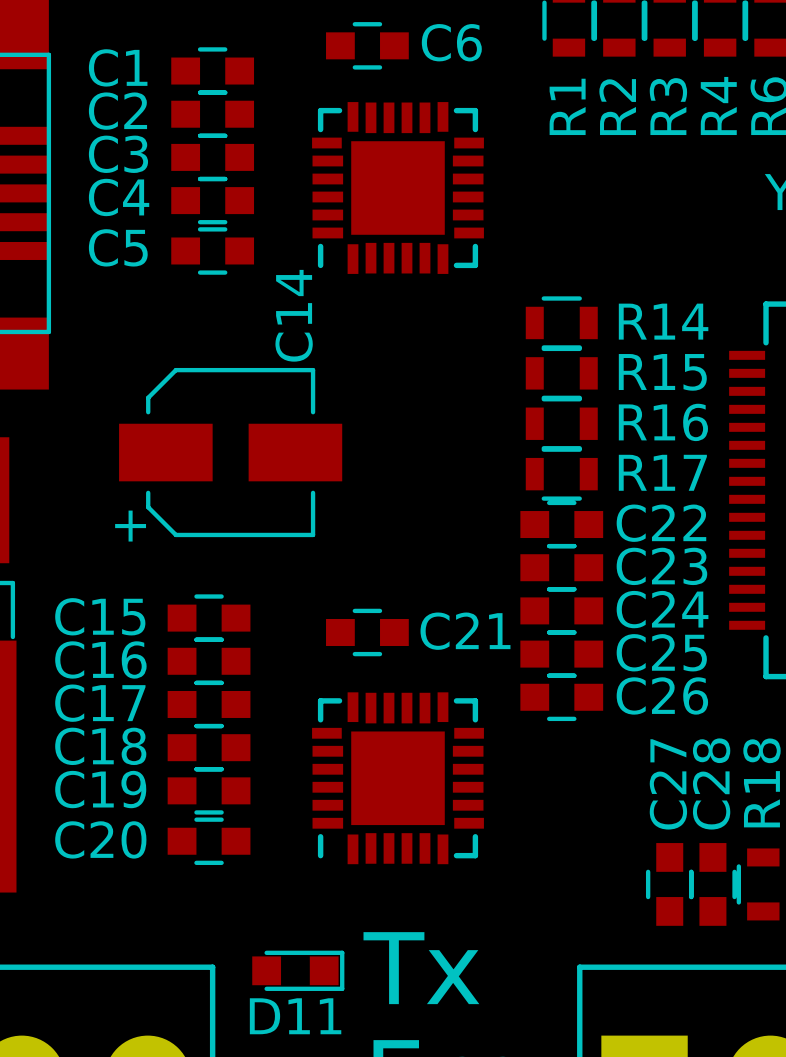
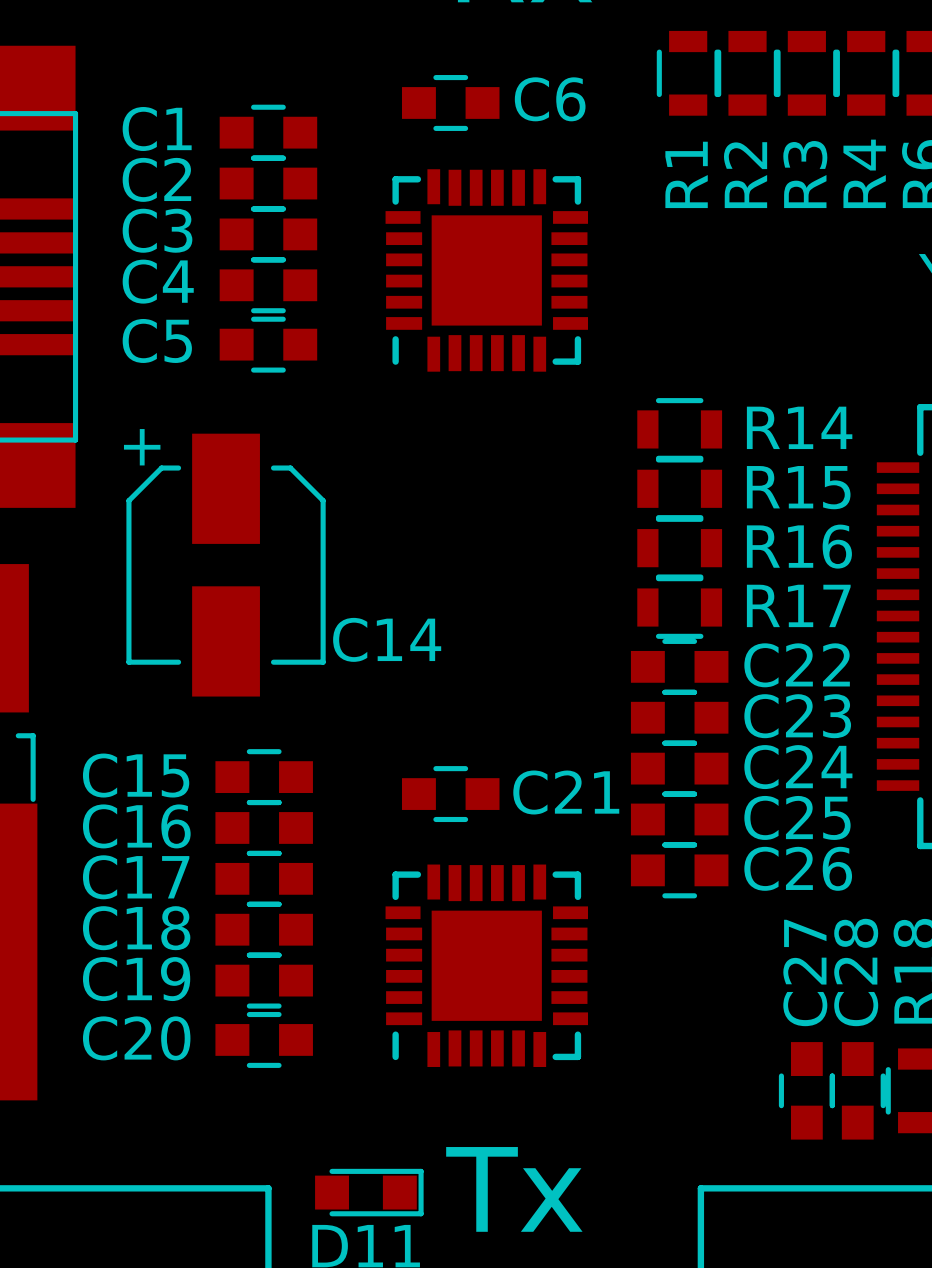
C14 rotation: 0° (230, 452) -> 90° clockwise (226, 565)

